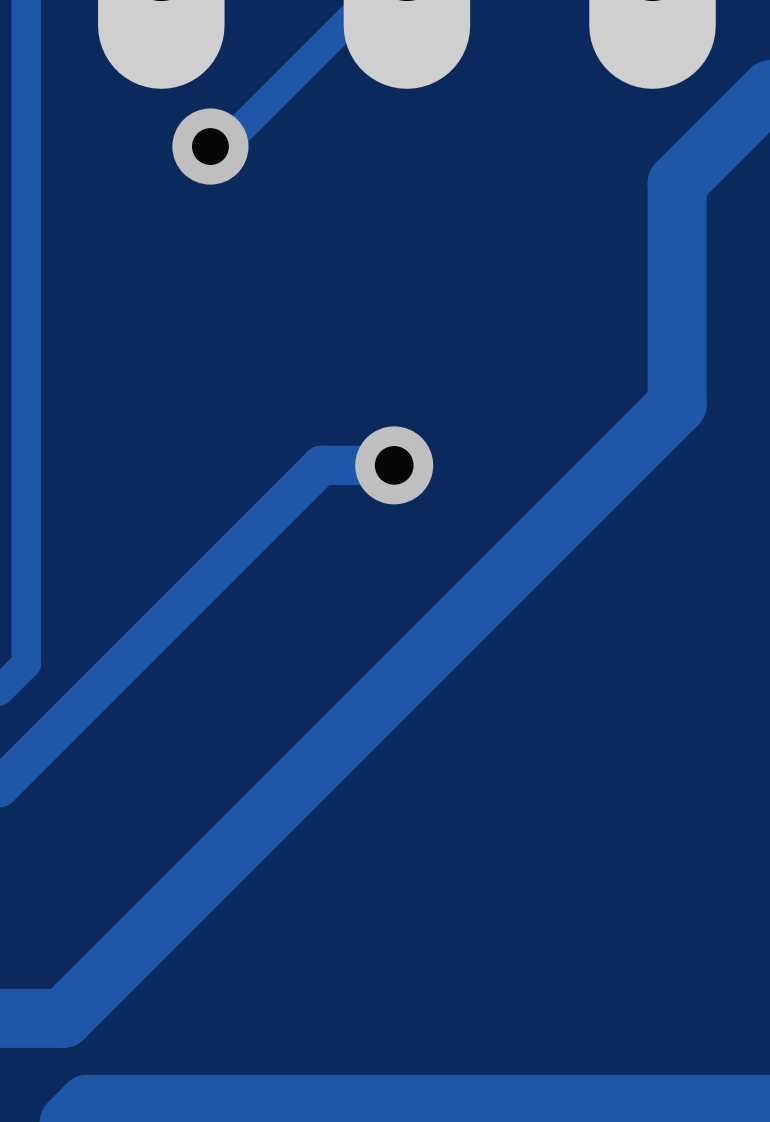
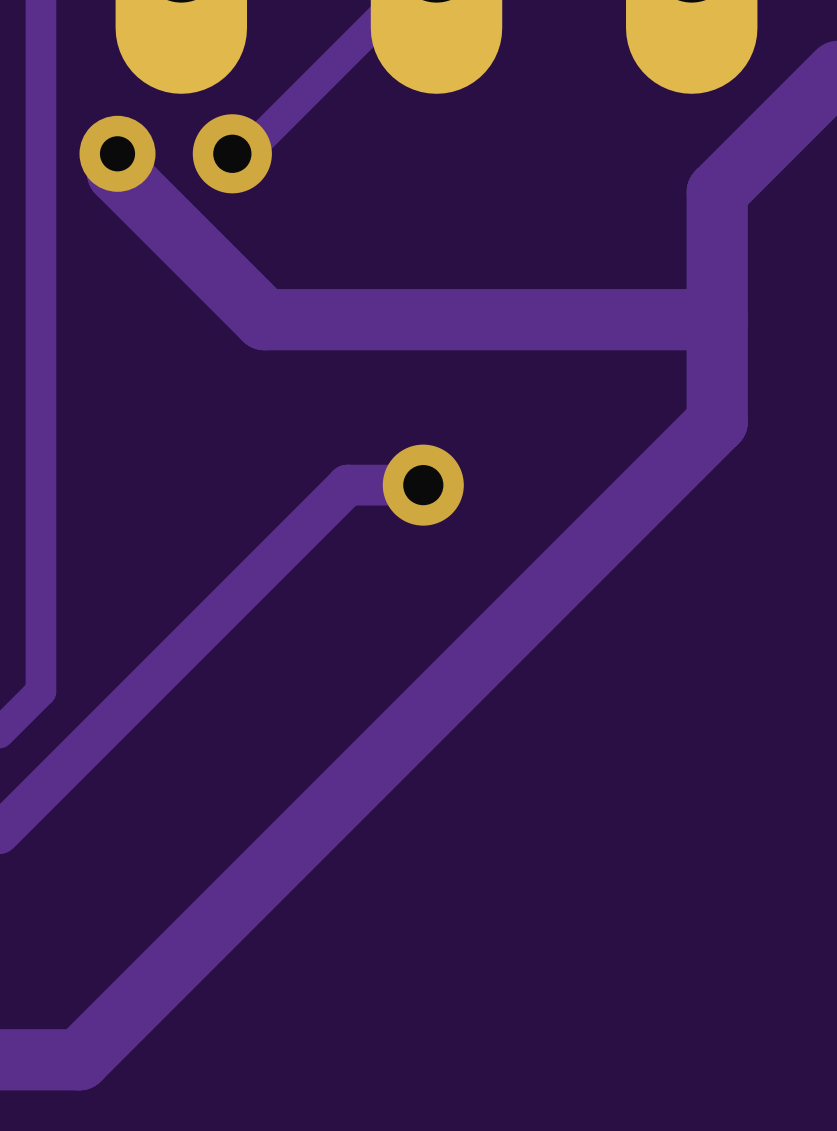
track: none -> (117, 153) (117, 172) (264, 319) (717, 319)
via: none -> (117, 153)

